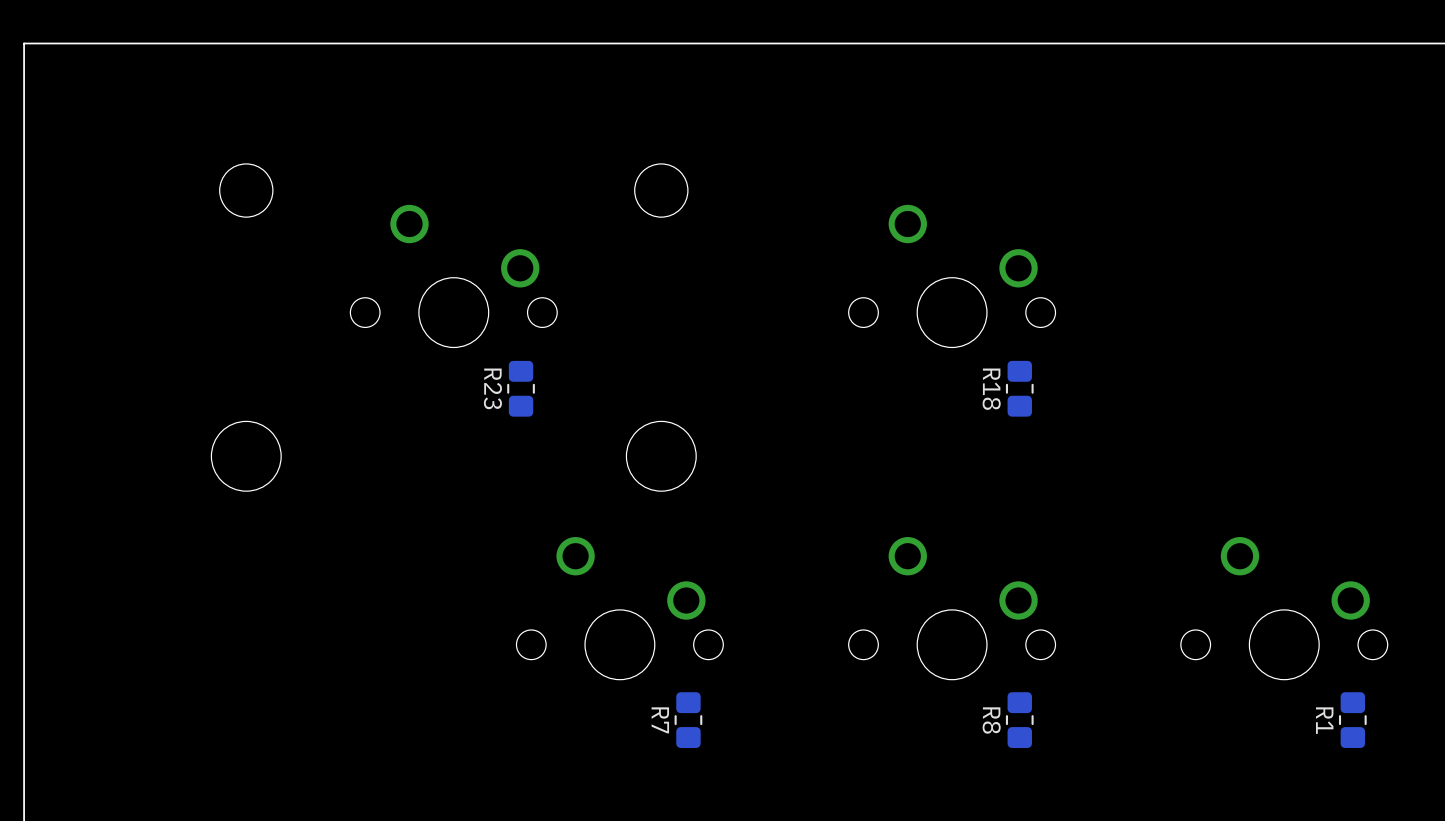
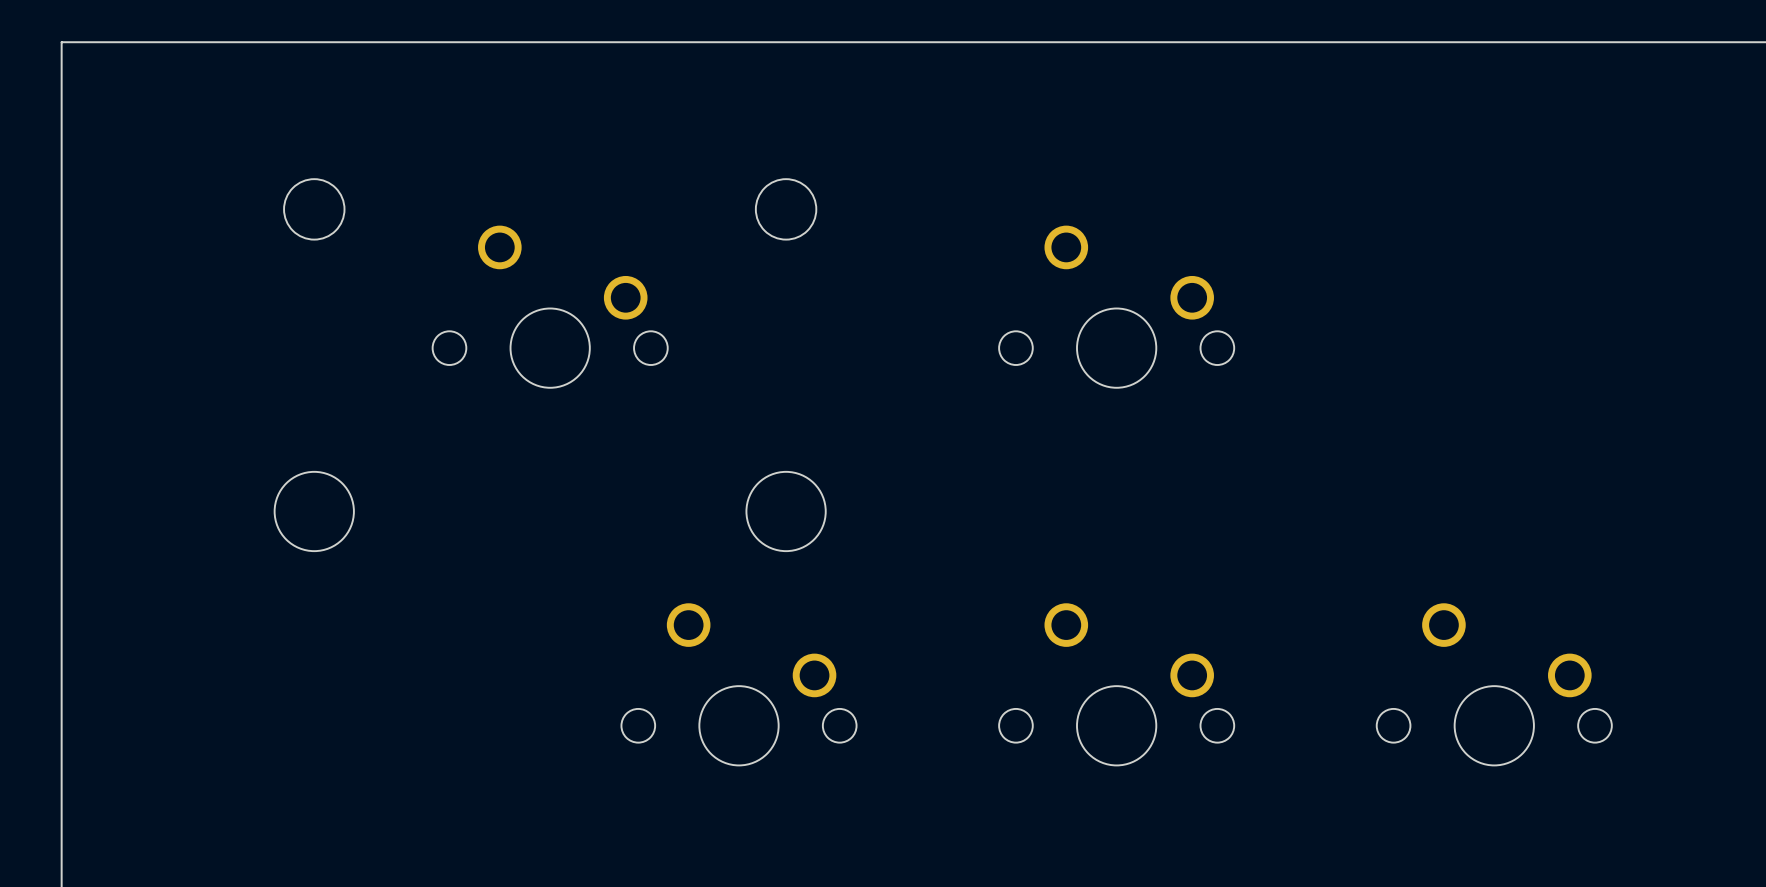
R23: (521, 388) -> none
R18: (1019, 388) -> none
R7: (688, 720) -> none
R8: (1019, 720) -> none
R1: (1352, 720) -> none

